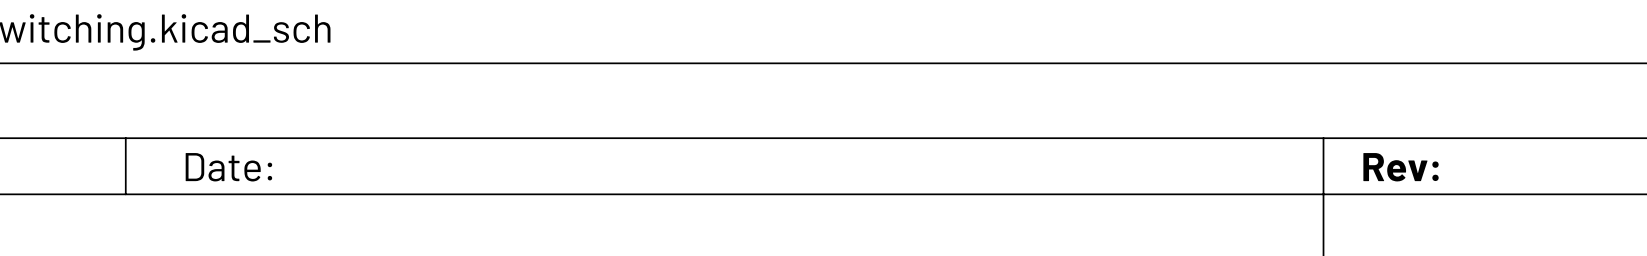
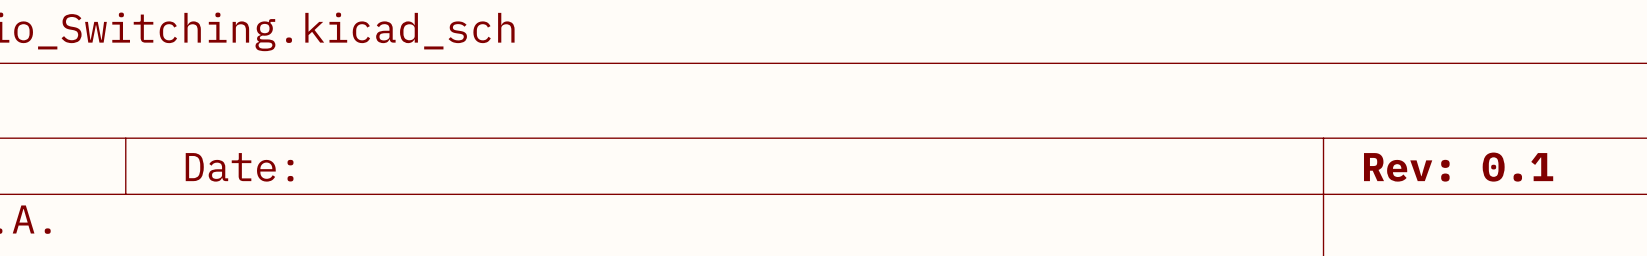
title block: Rev: (1401, 167) -> Rev: 0.1 (1458, 167)

